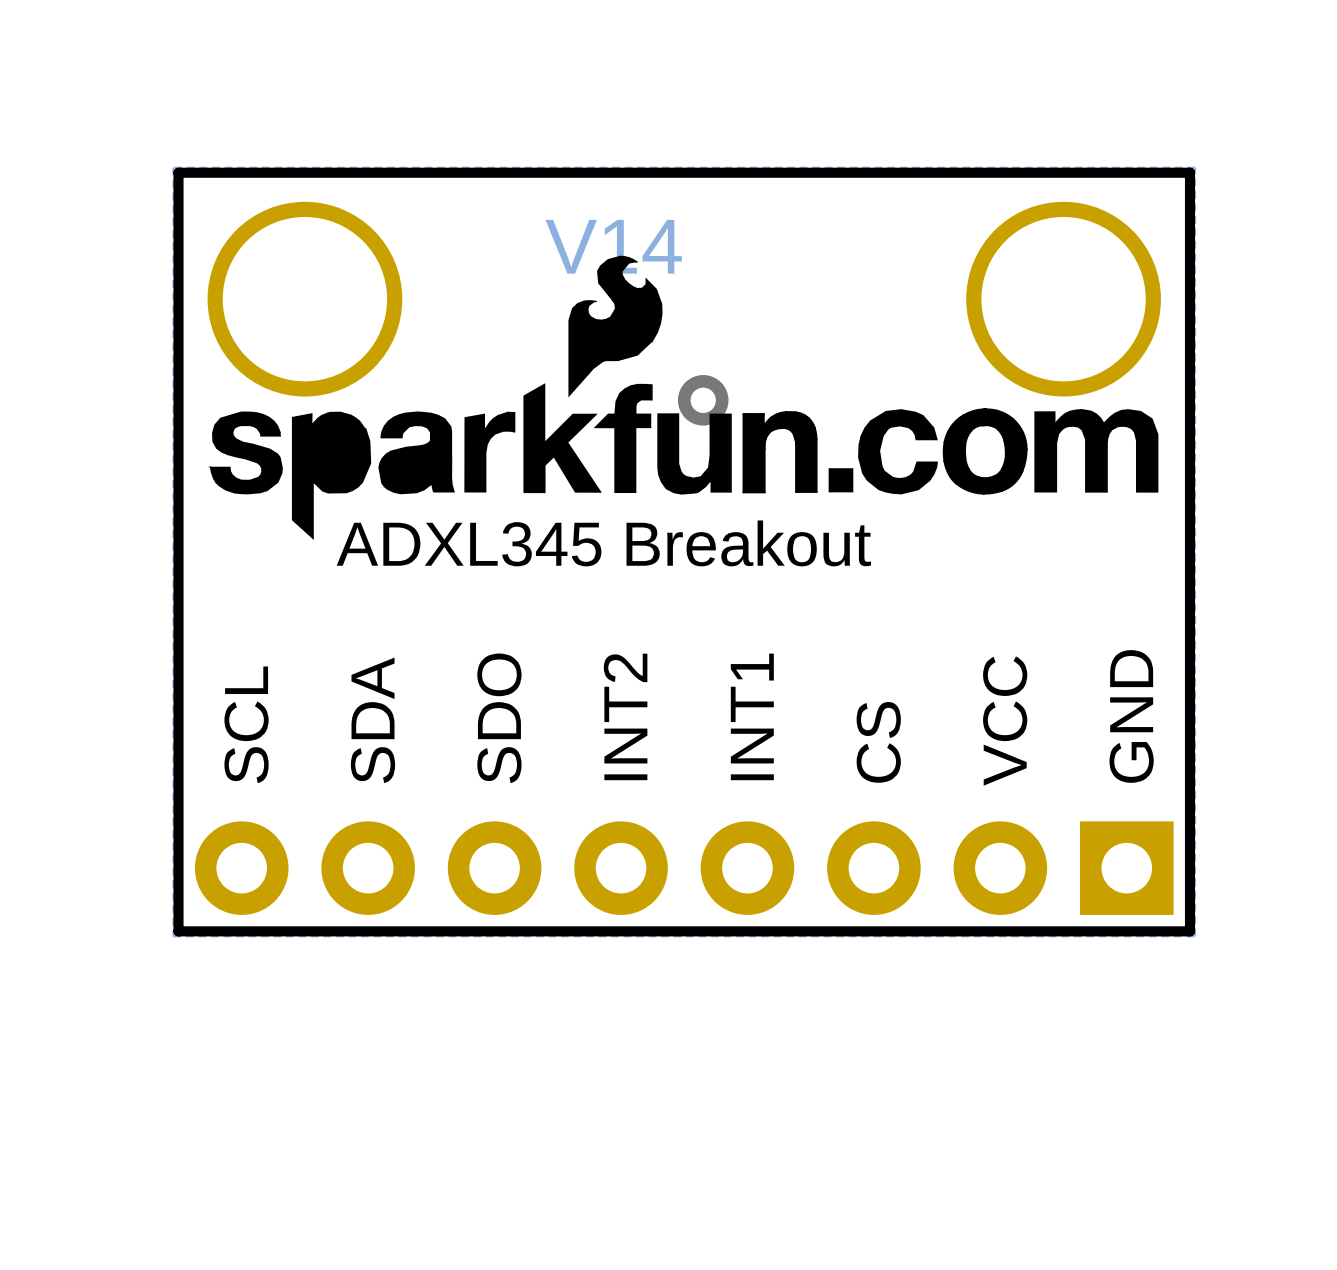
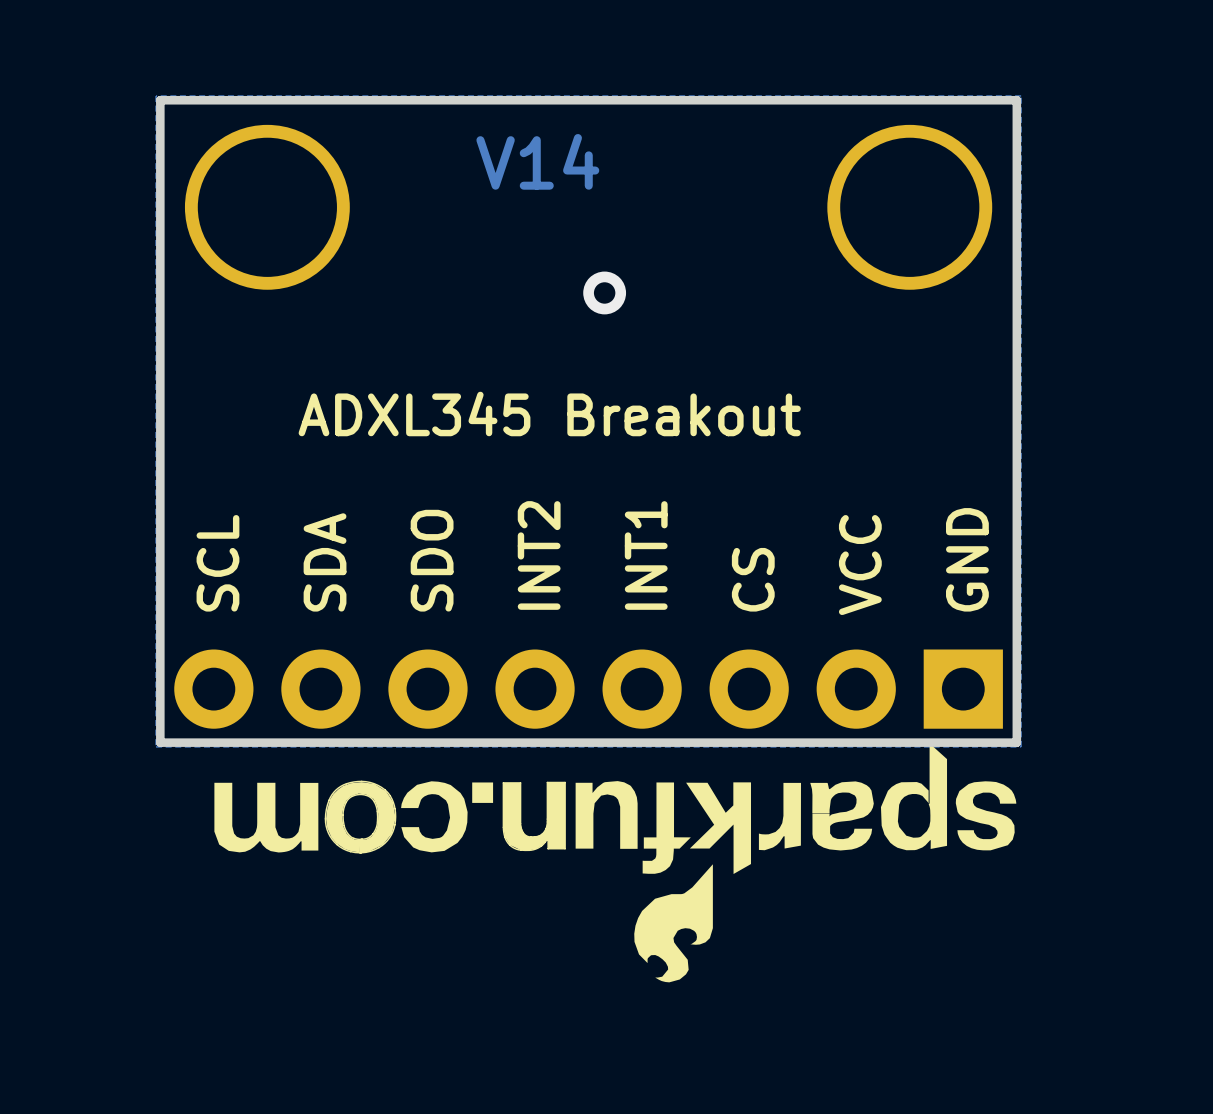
drawing: [208, 255, 1159, 540] -> none
drawing: none -> [214, 743, 1017, 983]

